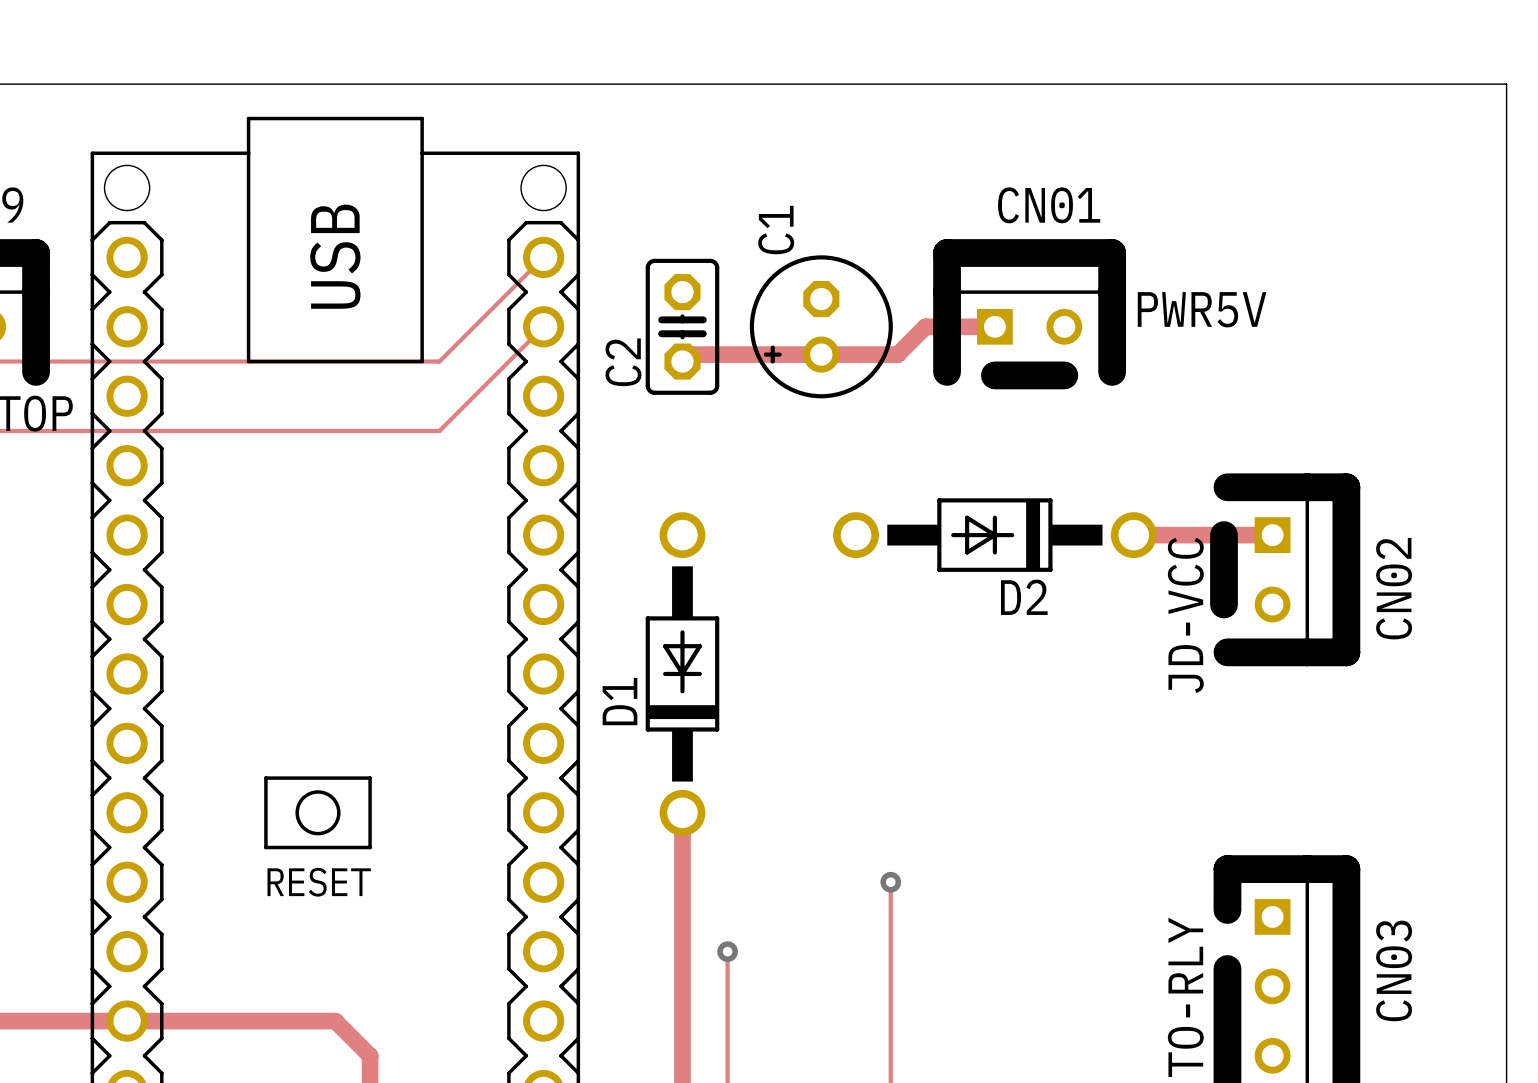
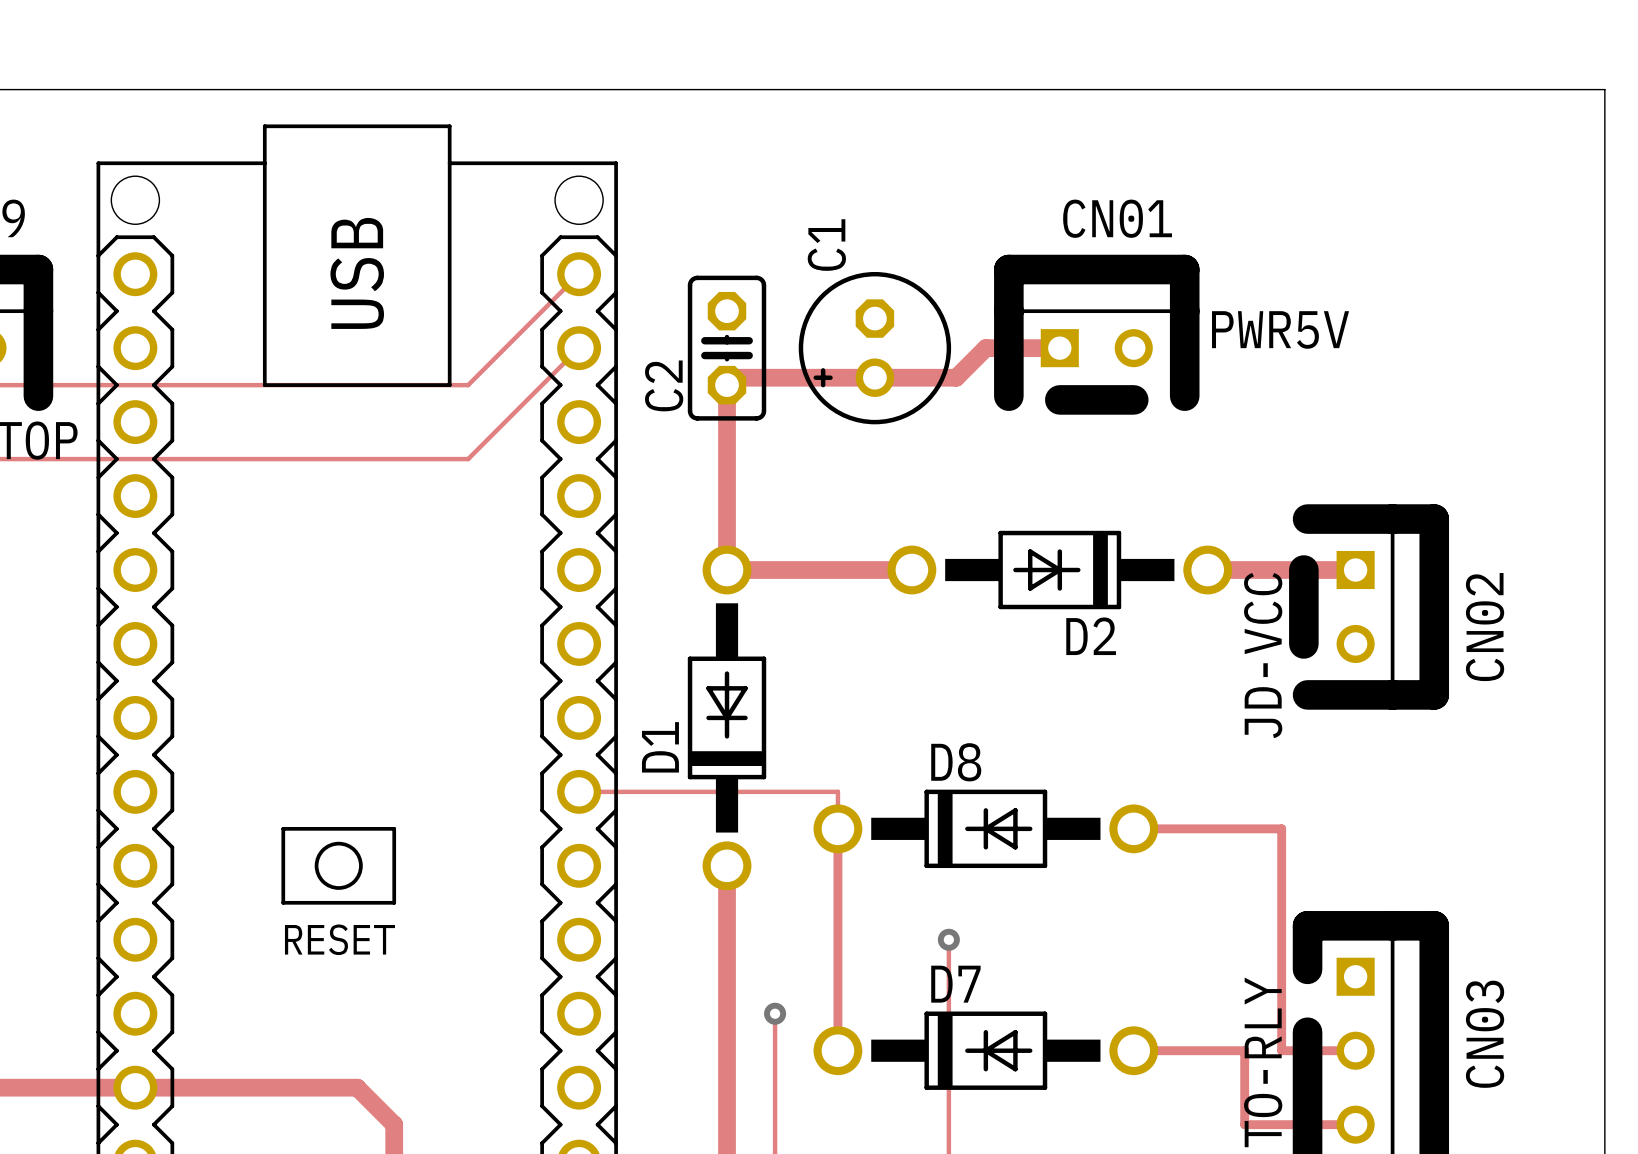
track: none -> (727, 385) (727, 570) (911, 570)
track: none -> (579, 791) (837, 791) (837, 1050)
D8: none -> (985, 828)
track: none -> (1133, 828) (1281, 828) (1281, 1050) (1355, 1050)
D7: none -> (985, 1050)
track: none -> (1133, 1050) (1244, 1050) (1244, 1124) (1355, 1124)

